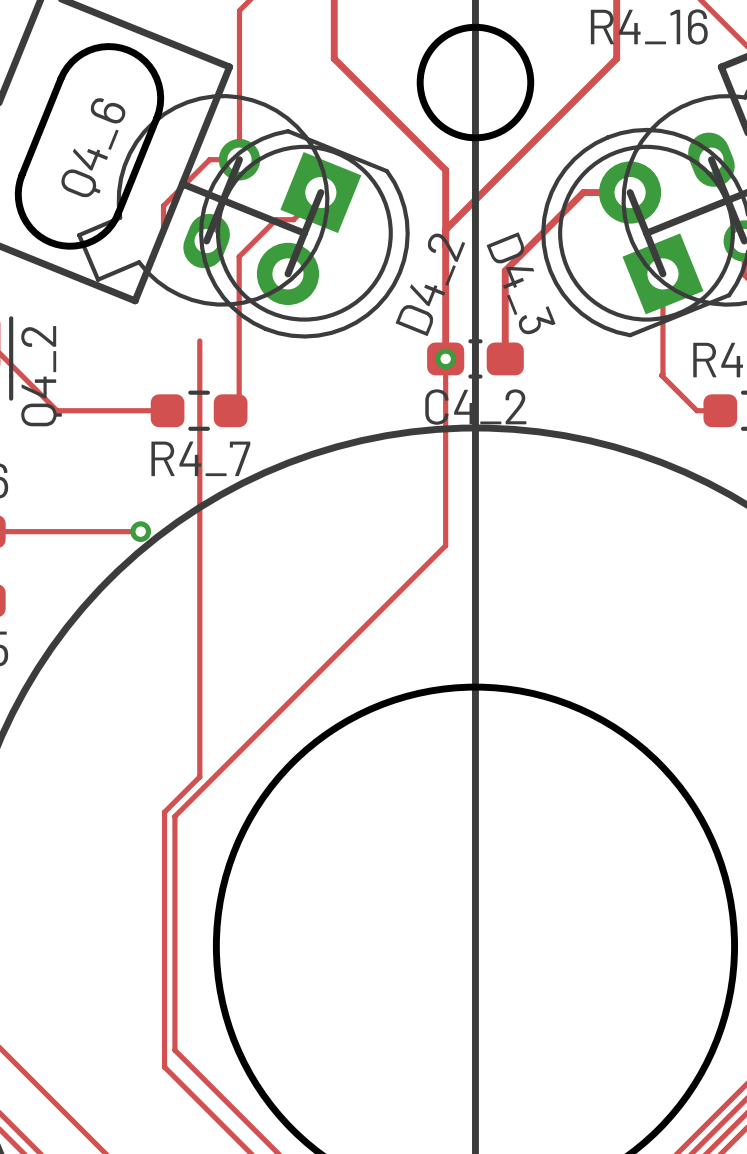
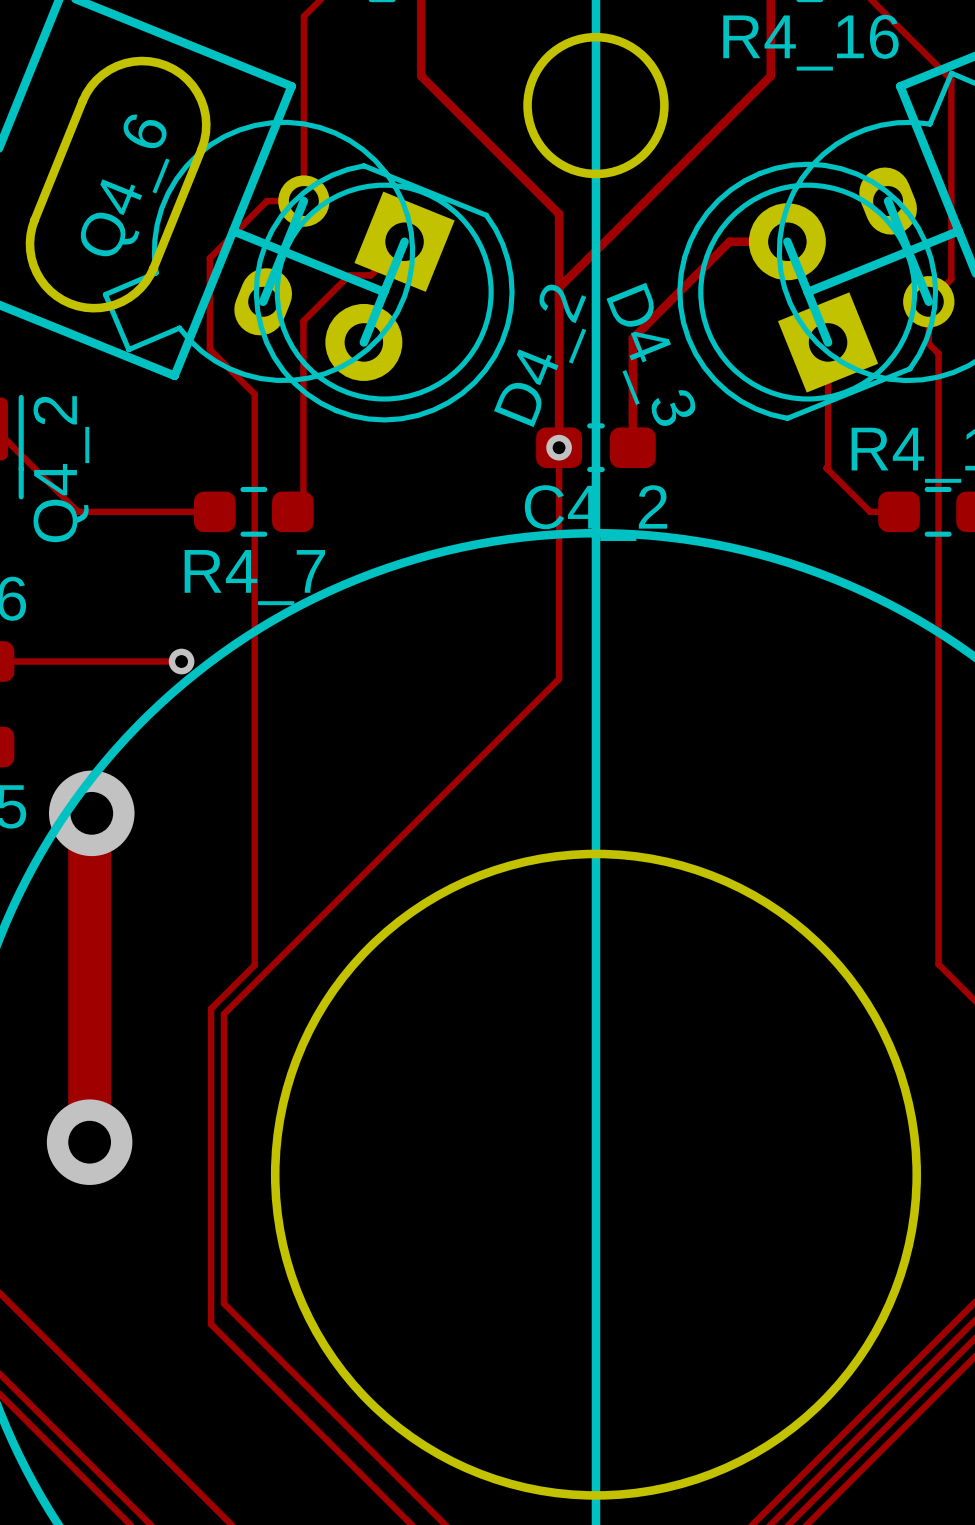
track: none -> (209, 286) (209, 349) (254, 394) (254, 425)
track: none -> (91, 813) (89, 815) (89, 1142)
via: none -> (91, 813)
via: none -> (89, 1142)

